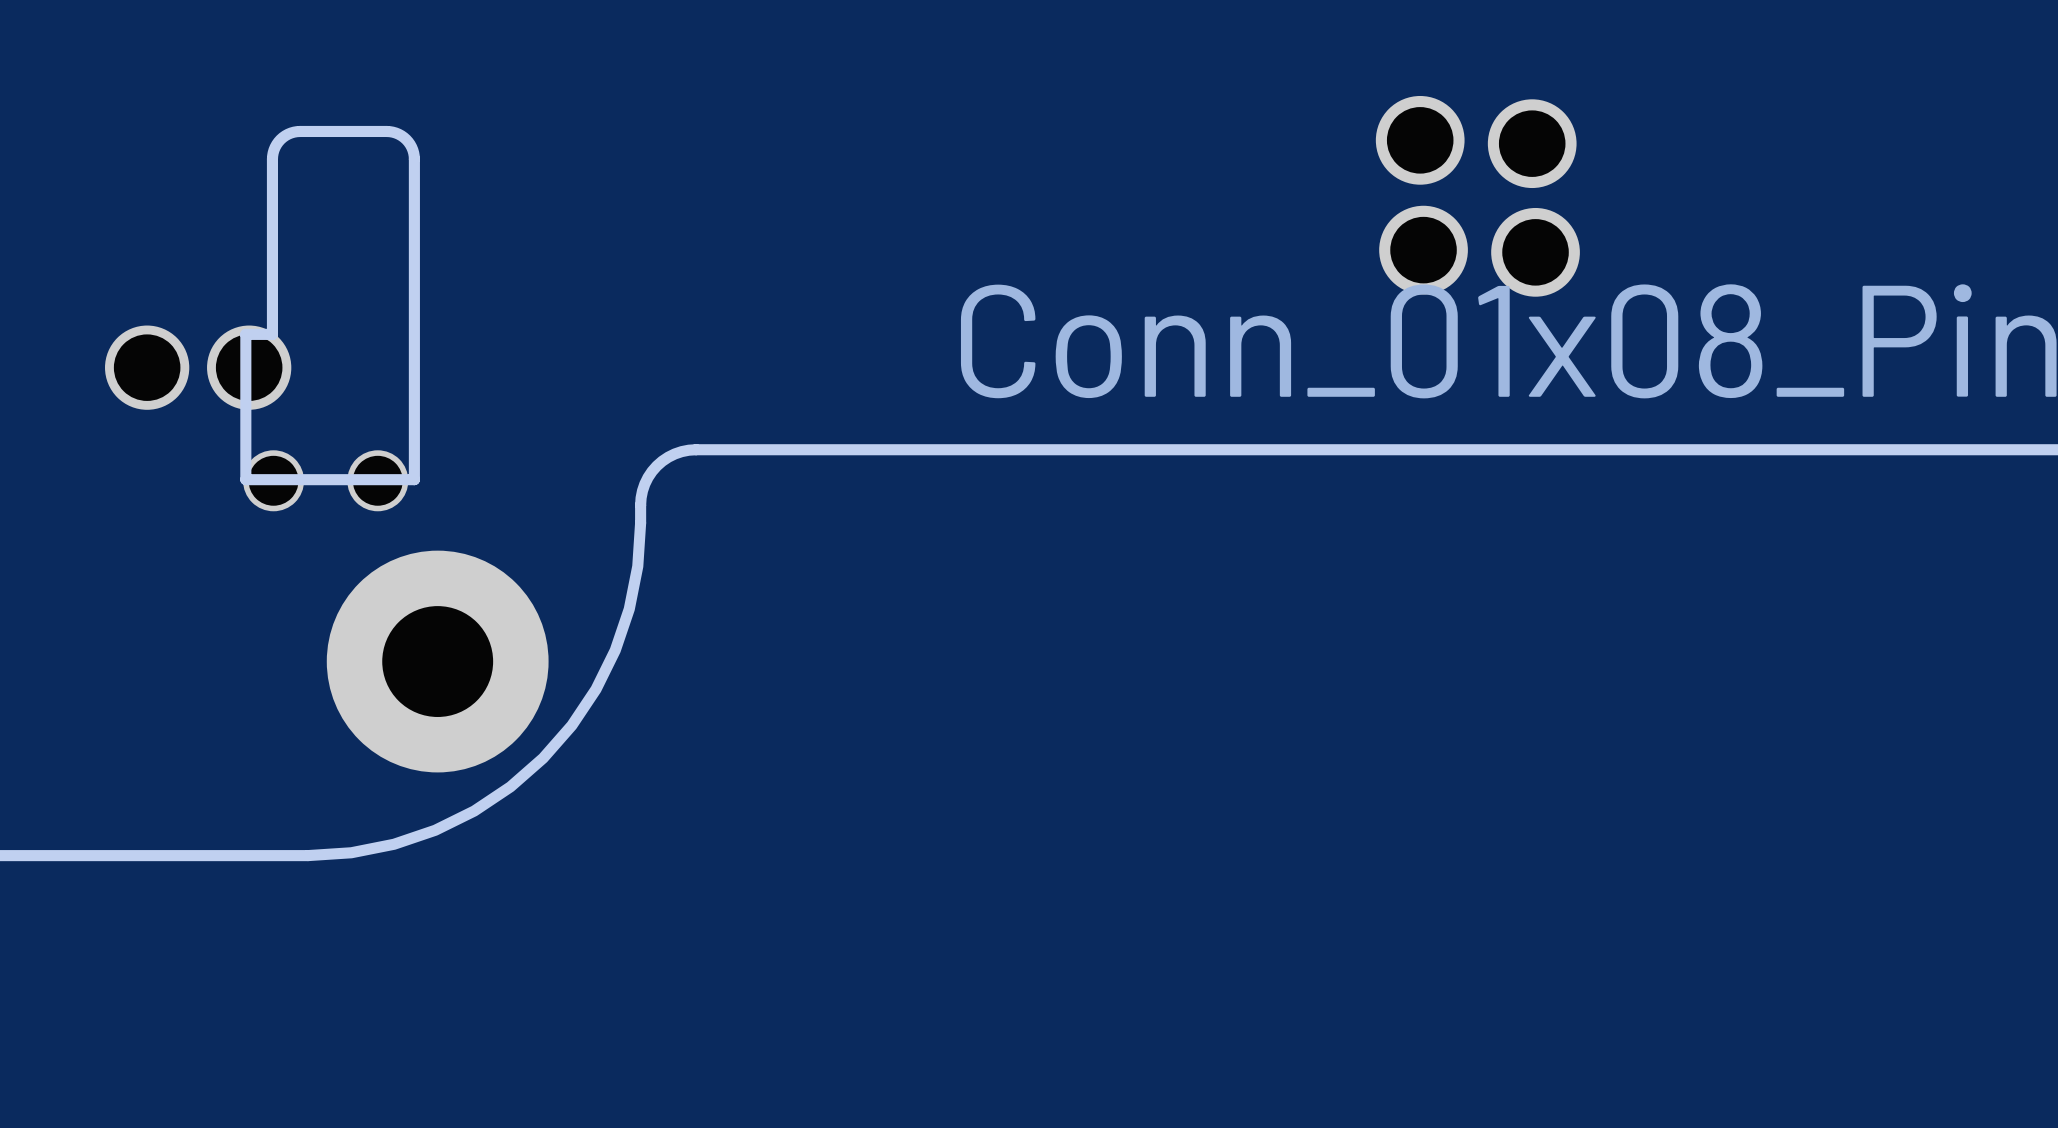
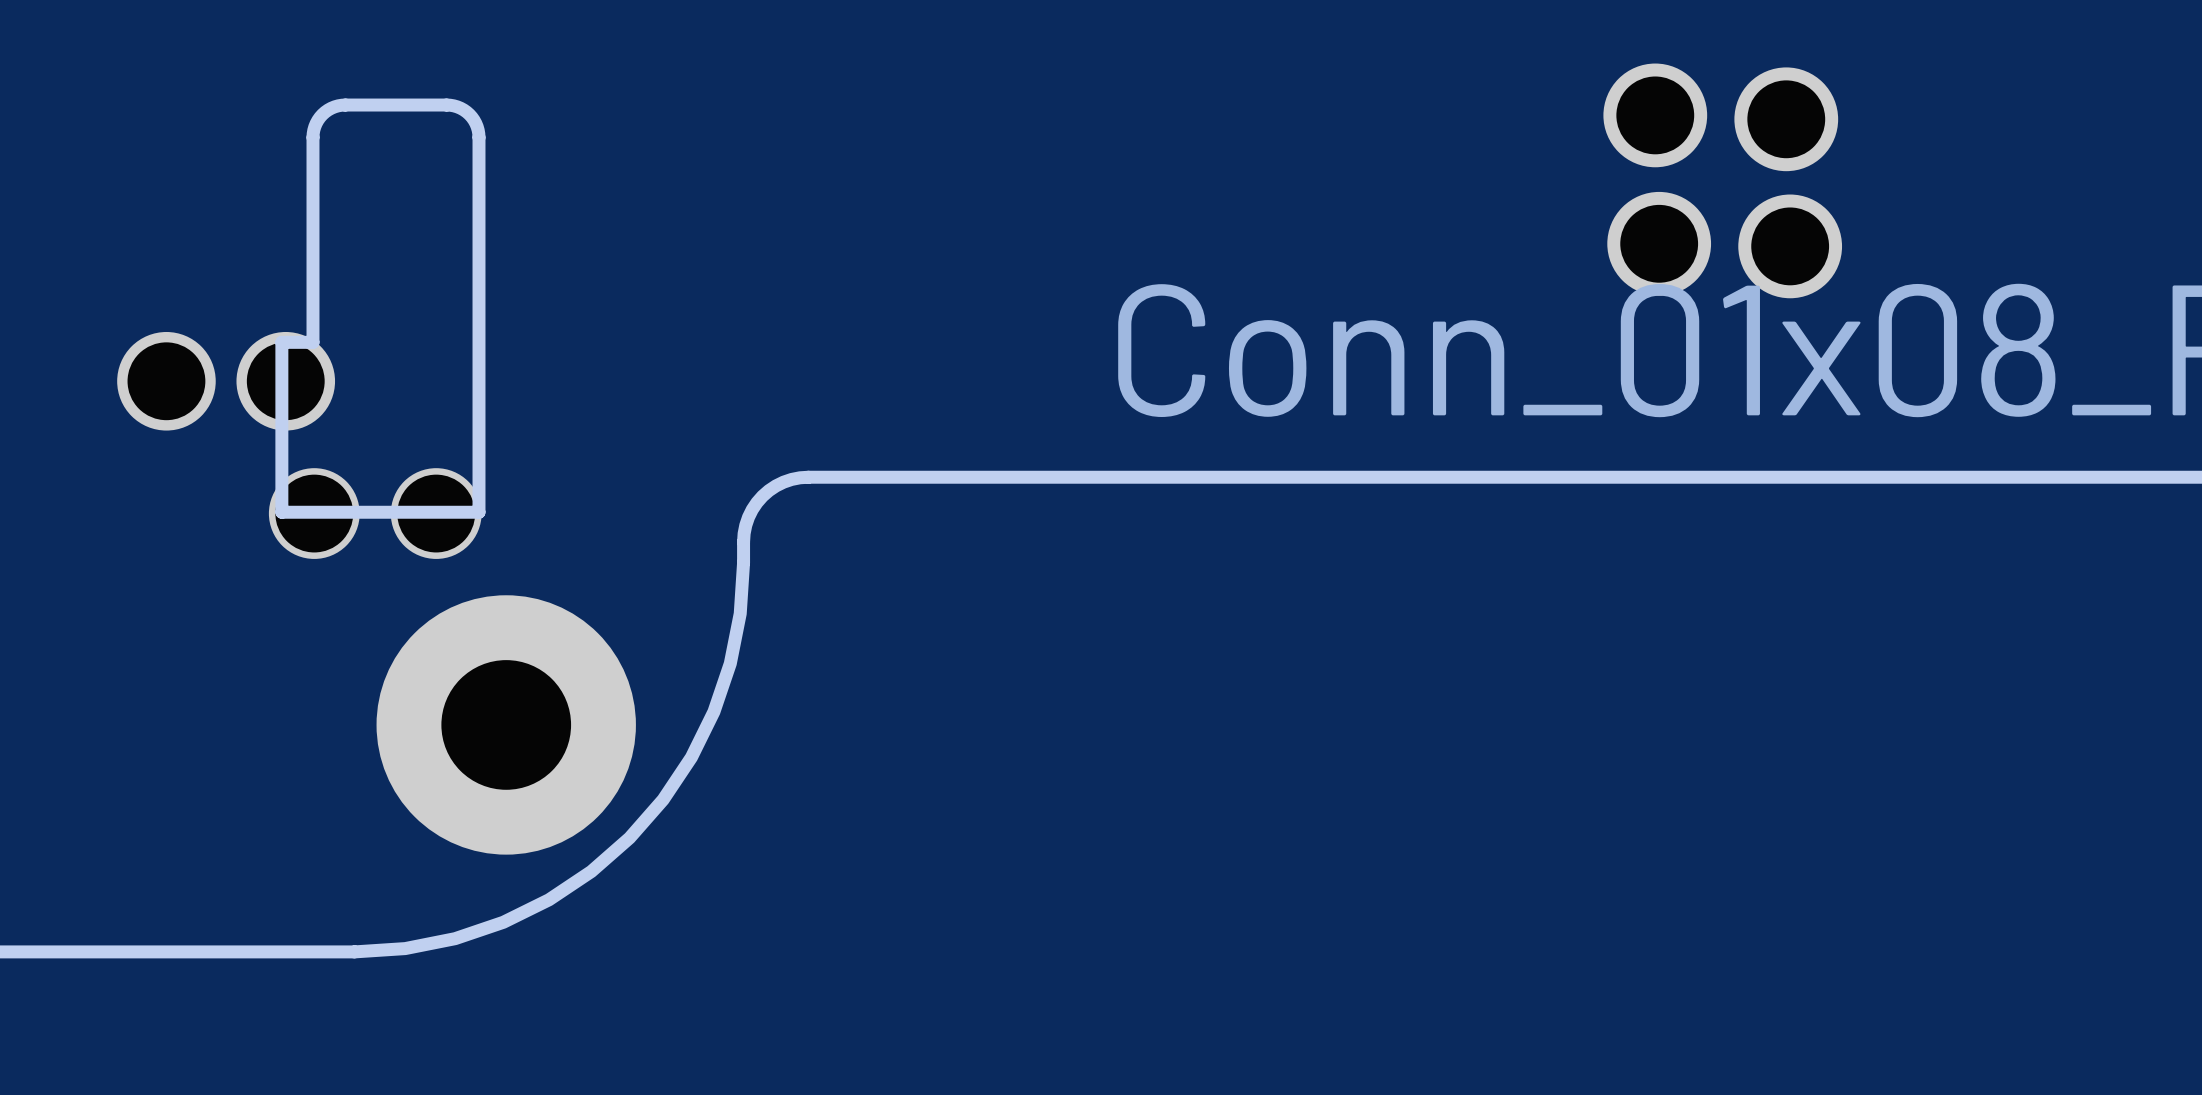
part footprint: [105, 95, 1580, 512] -> [117, 63, 1843, 559]

